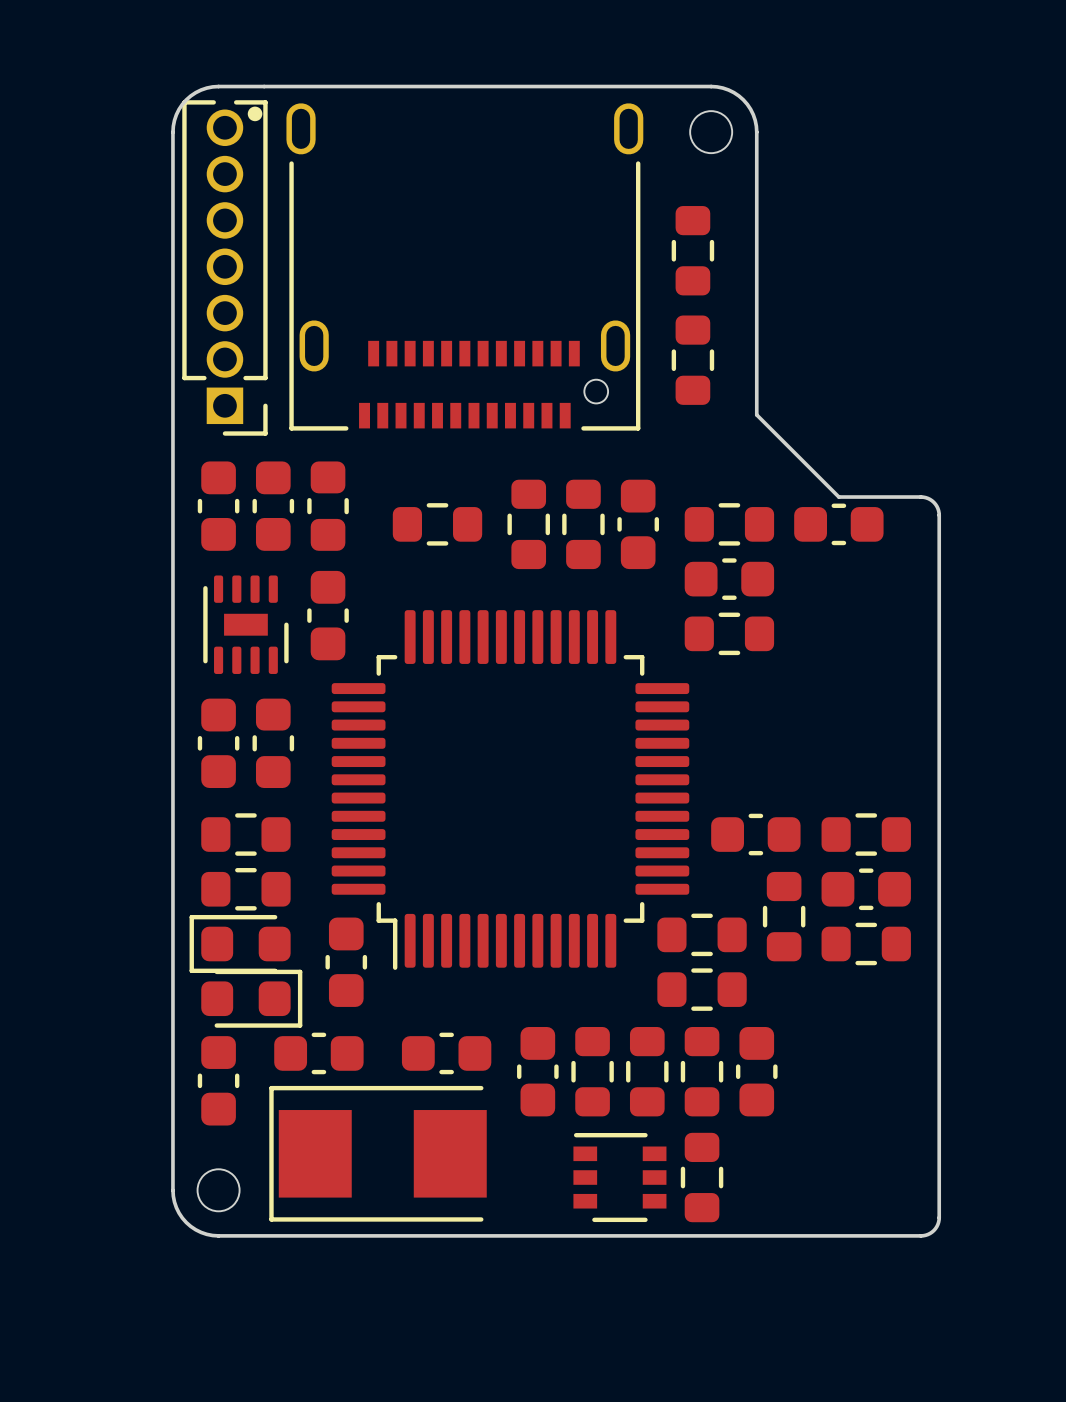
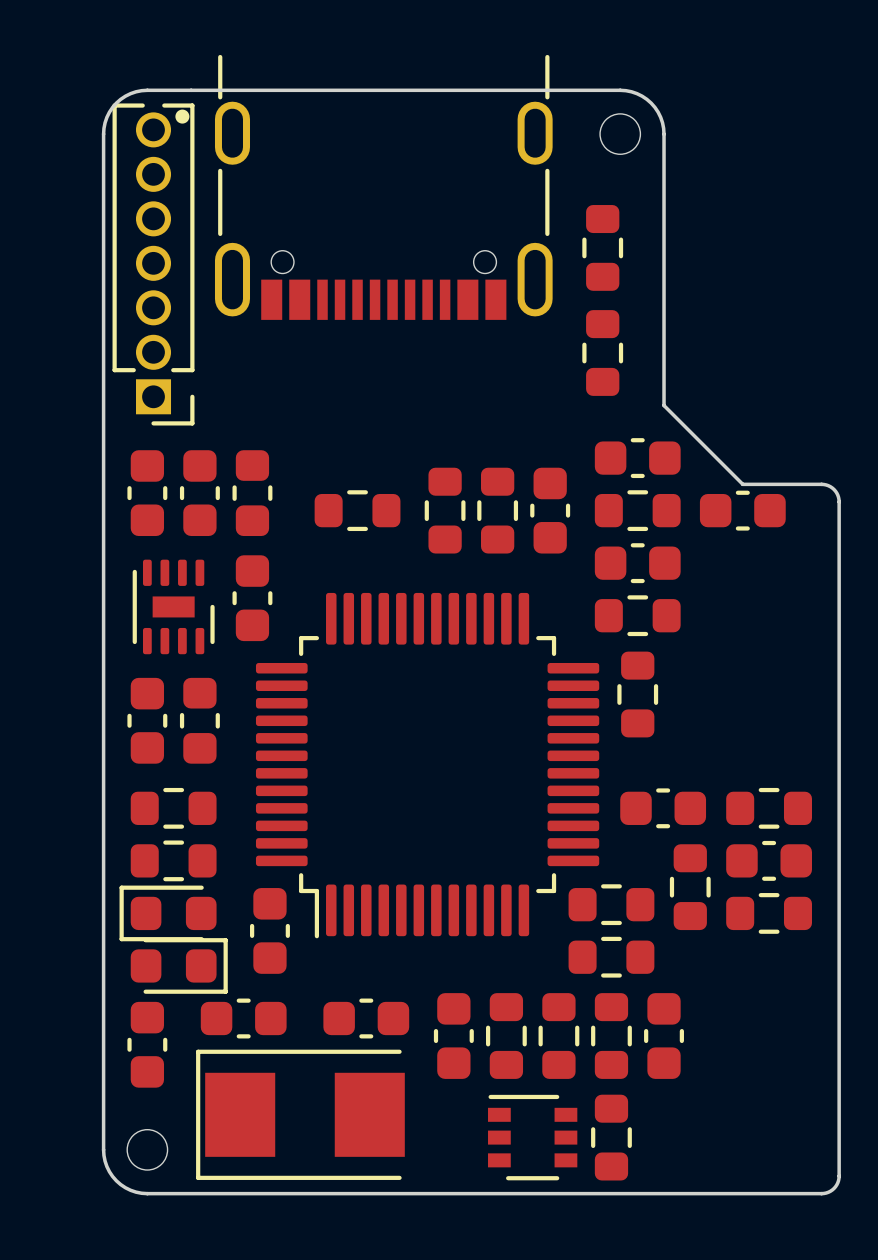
part: none -> (383, 187)
part: (464, 266) -> none
part: none -> (637, 458)
part: none -> (637, 694)

